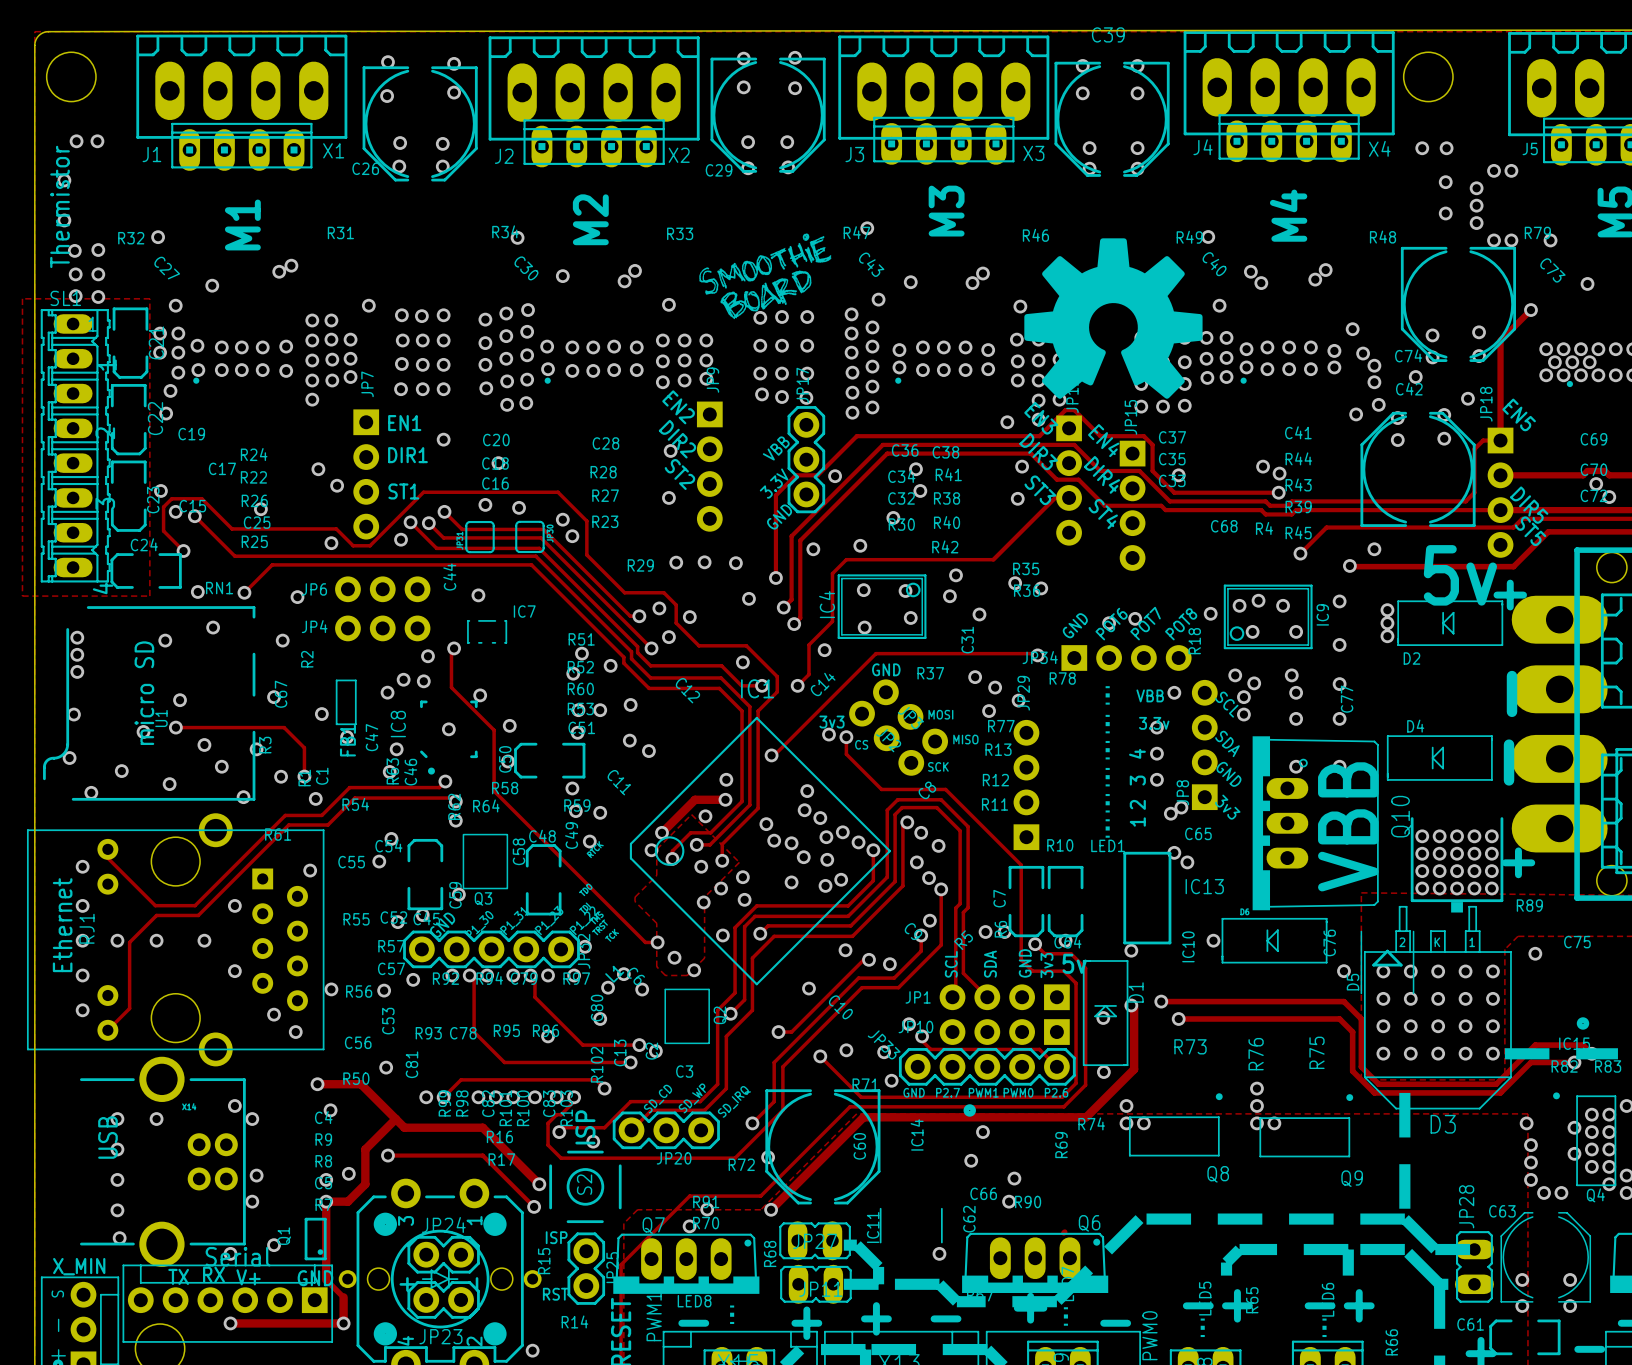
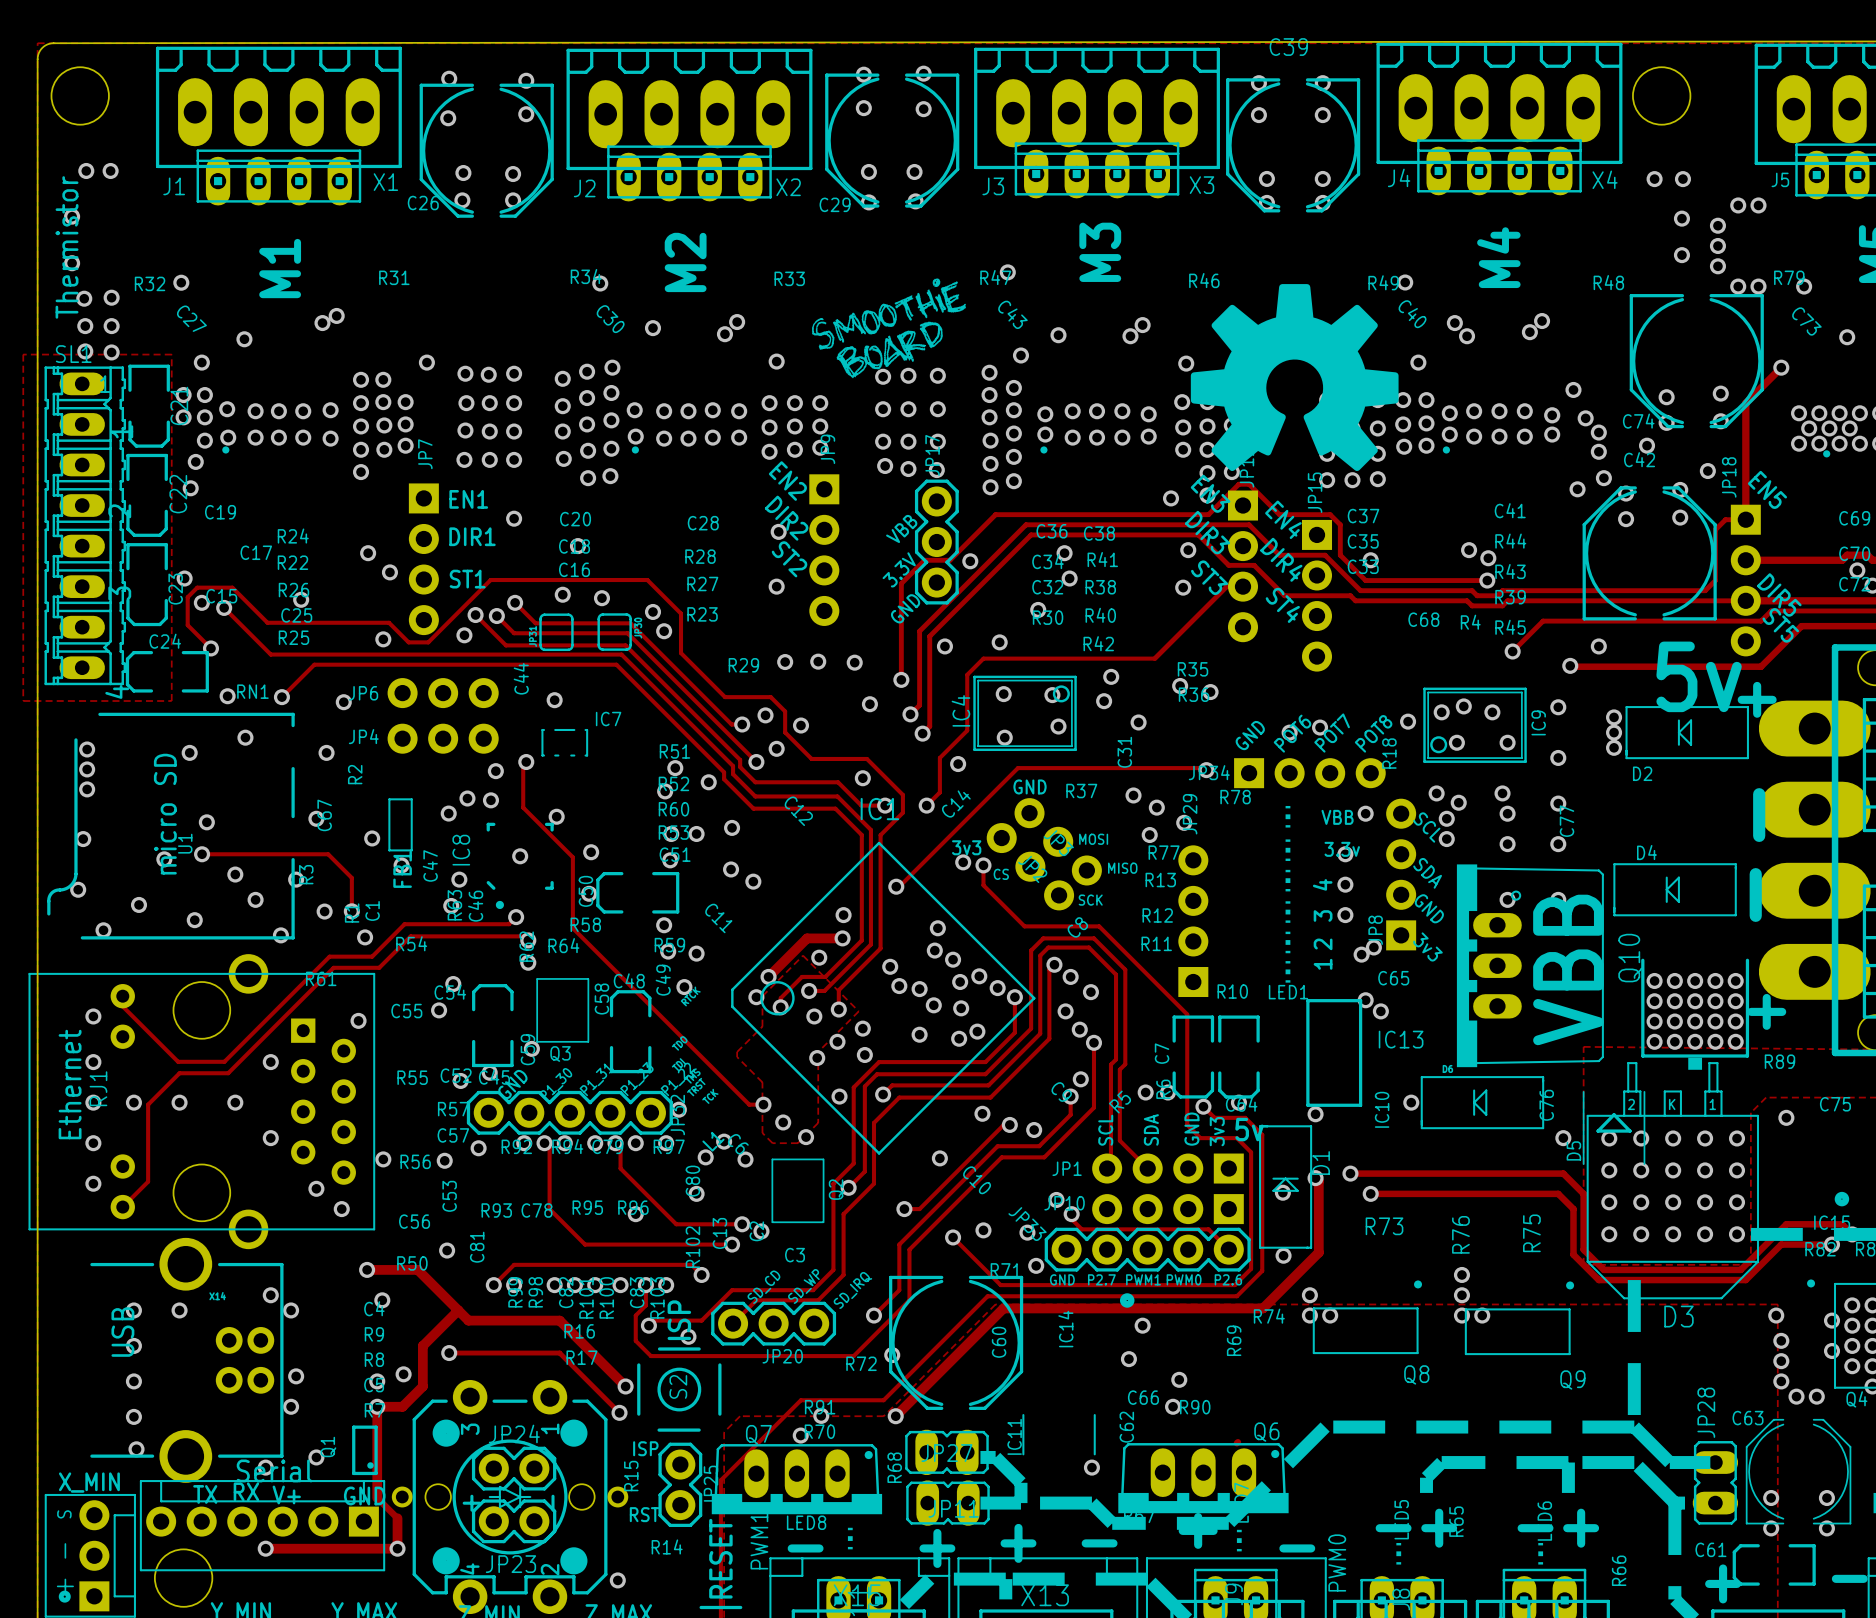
track: (461, 1079) (443, 1097) -> (534, 1264) (514, 1264) (493, 1285)
track: (574, 1097) (574, 1101) (561, 1114) (556, 1114) -> (645, 1285) (645, 1305)

